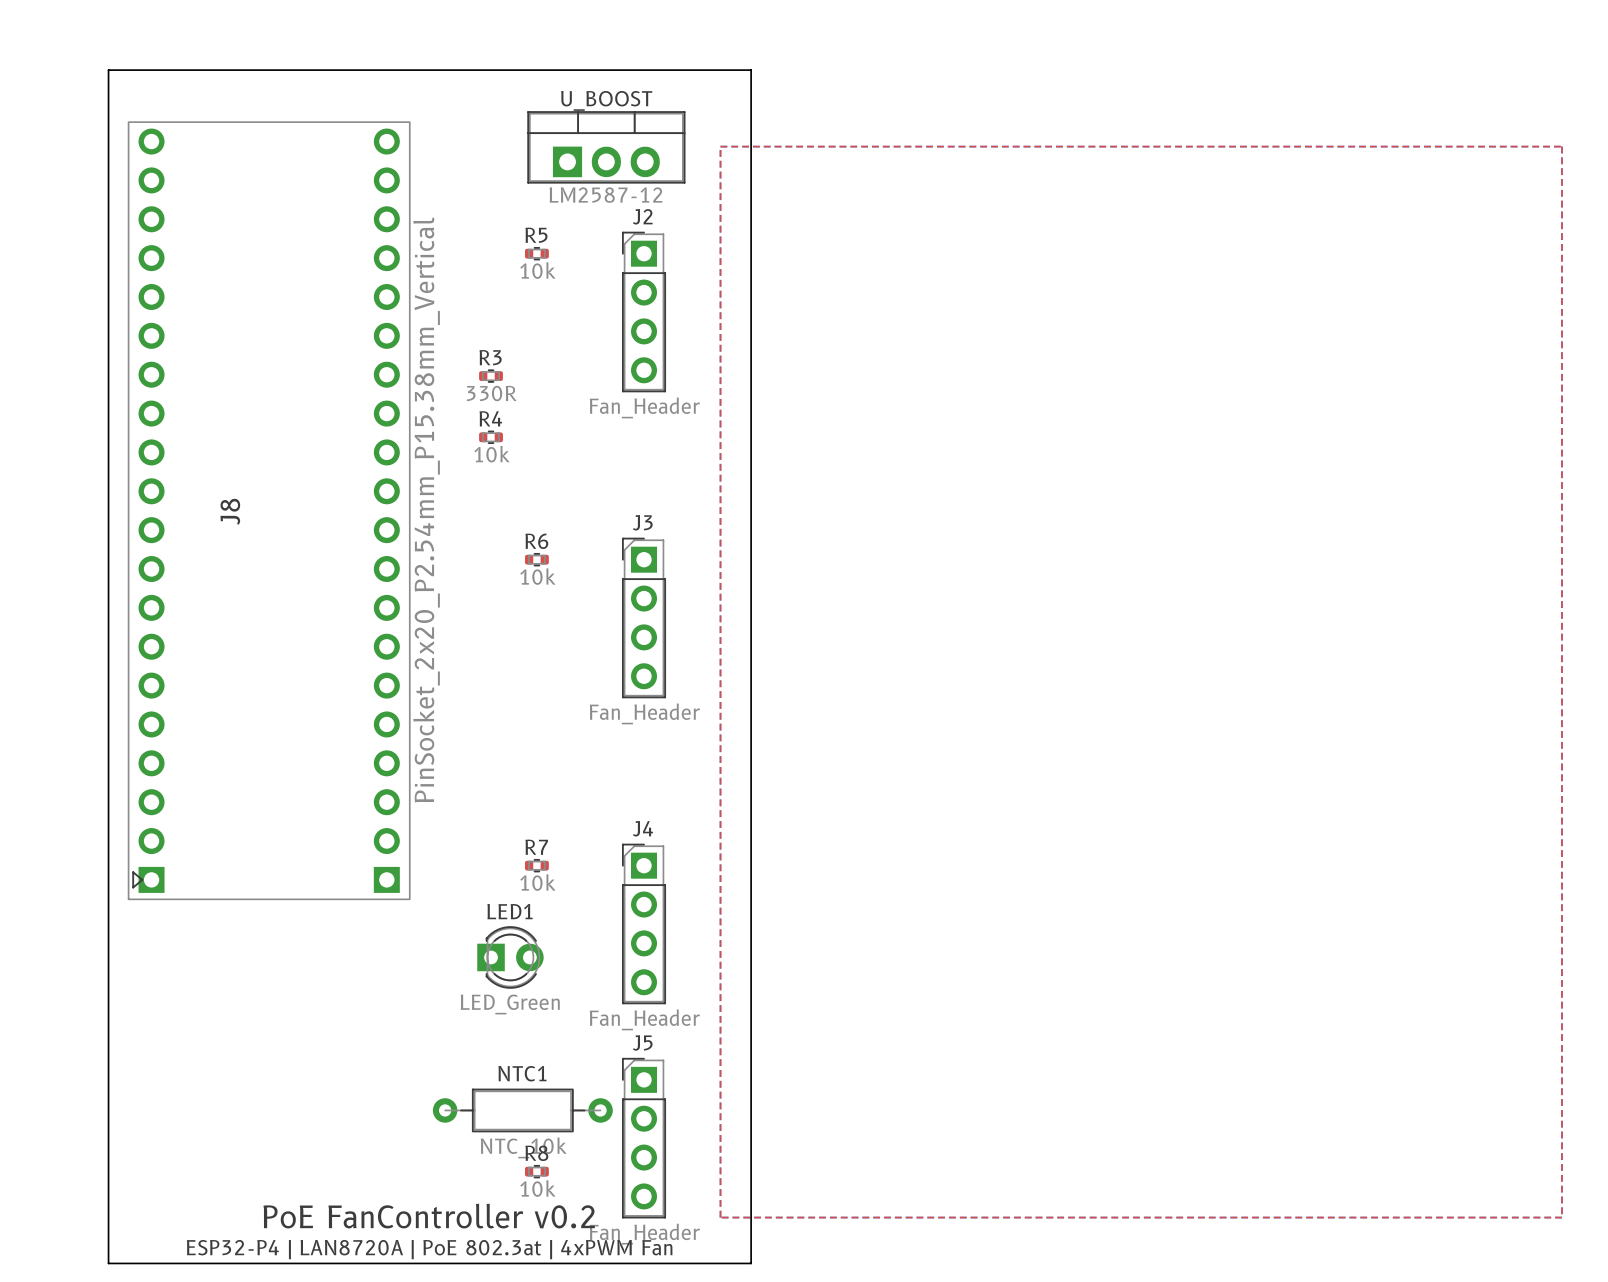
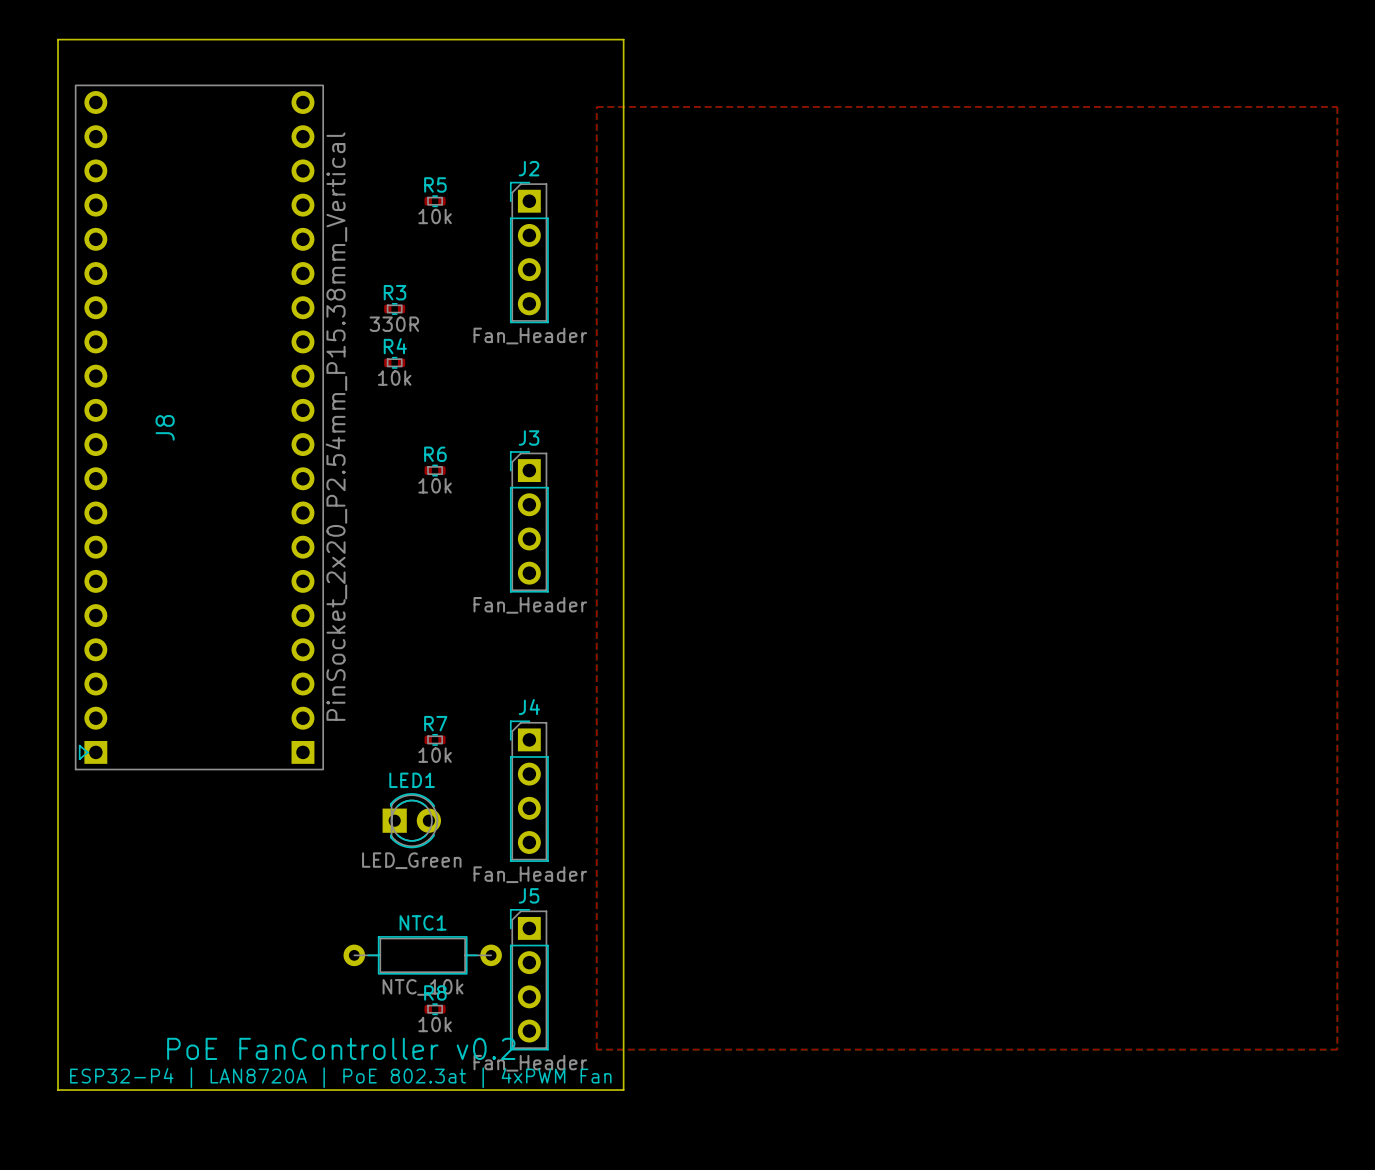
U_BOOST: LM2587-12 (606, 147) -> none

